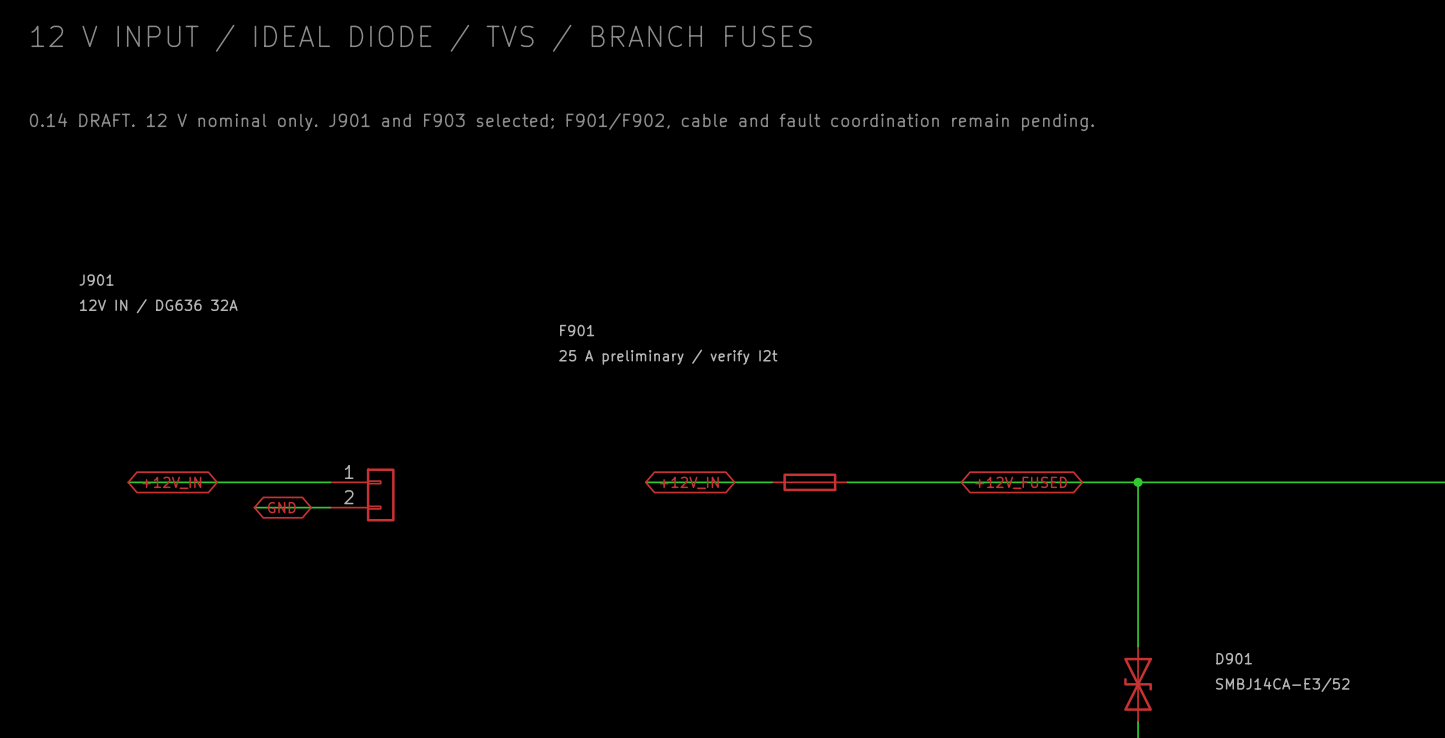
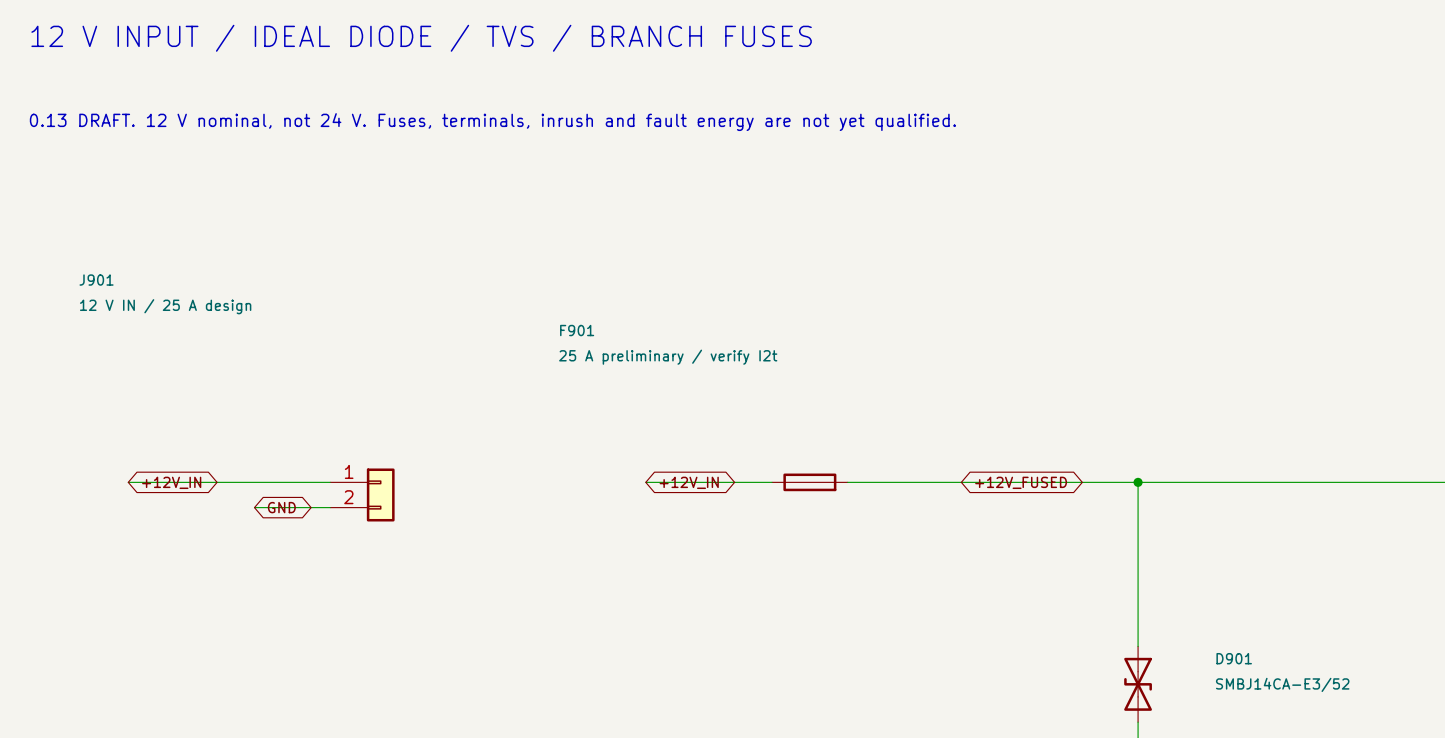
text: 0.14 DRAFT. 12 V nominal only. J901 and F903 selected; F901/F902, cable and fault coordination remain pending. (561, 122) -> 0.13 DRAFT. 12 V nominal, not 24 V. Fuses, terminals, inrush and fault energy are not yet qualified. (492, 122)
J901 value: 12V IN / DG636 32A (158, 306) -> 12 V IN / 25 A design (165, 306)

